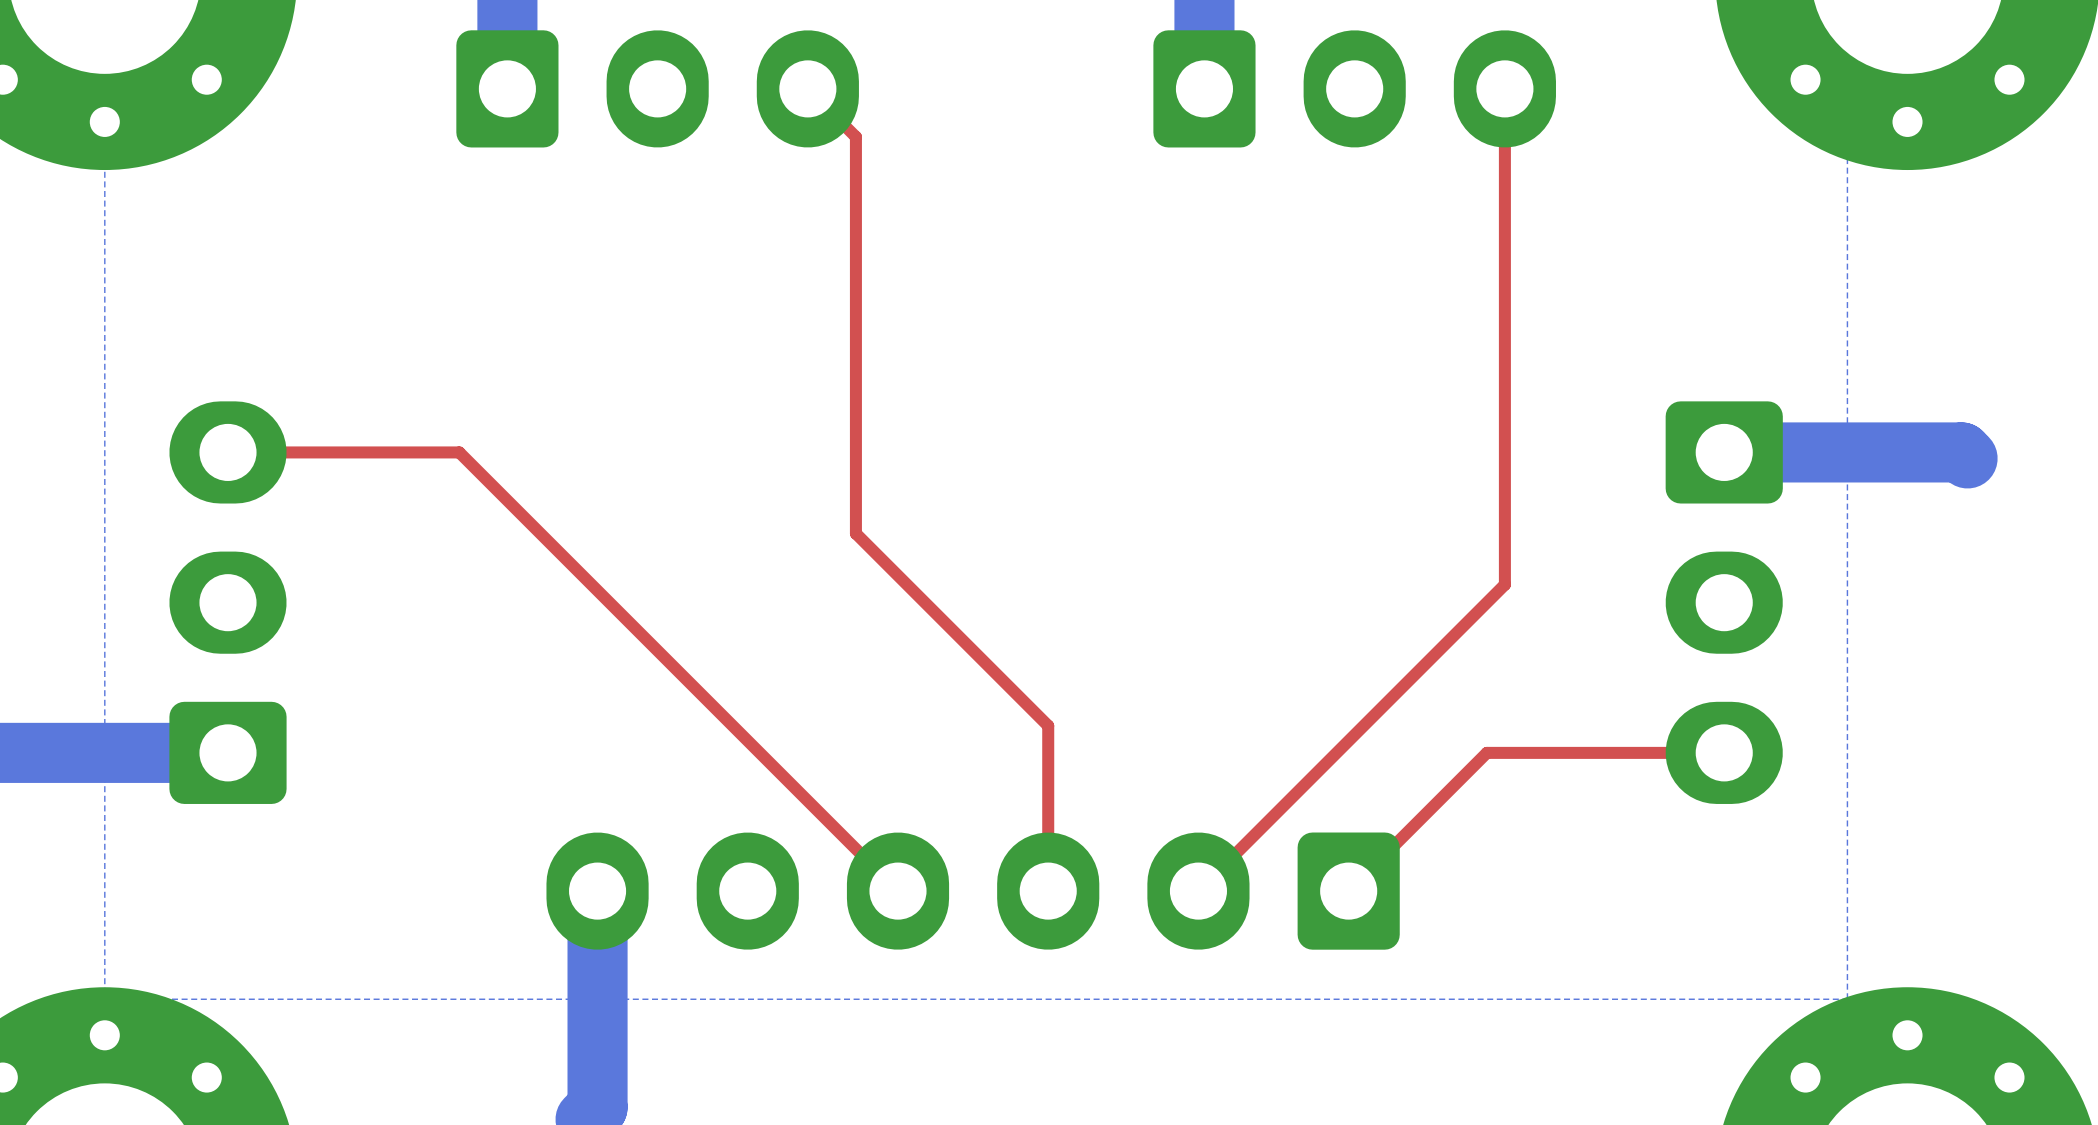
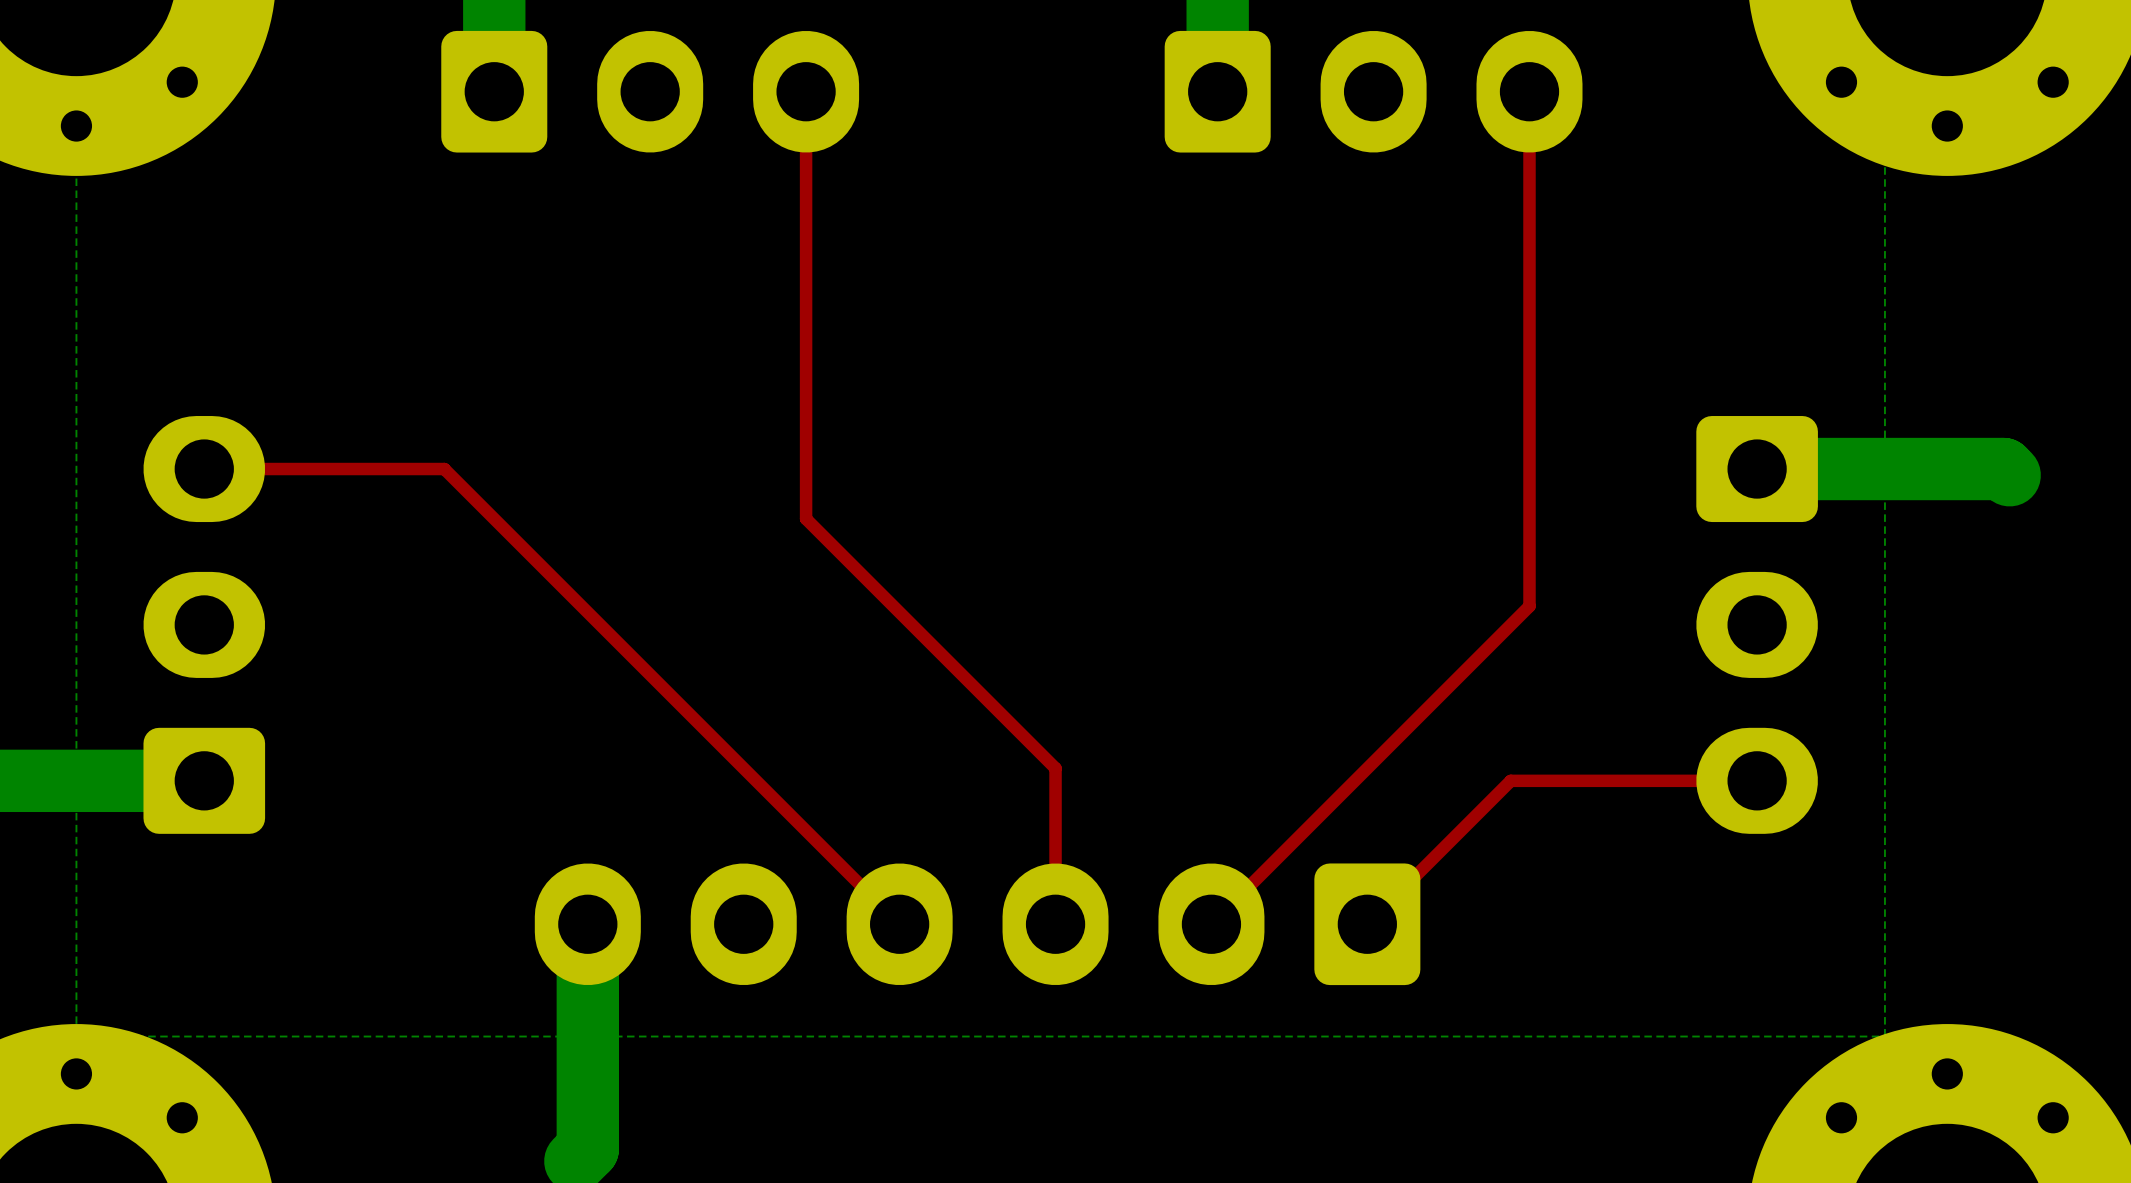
top track: (807, 88) (855, 136) (855, 533) (1048, 725) (1048, 740) -> (806, 91) (806, 518) (1055, 768)

